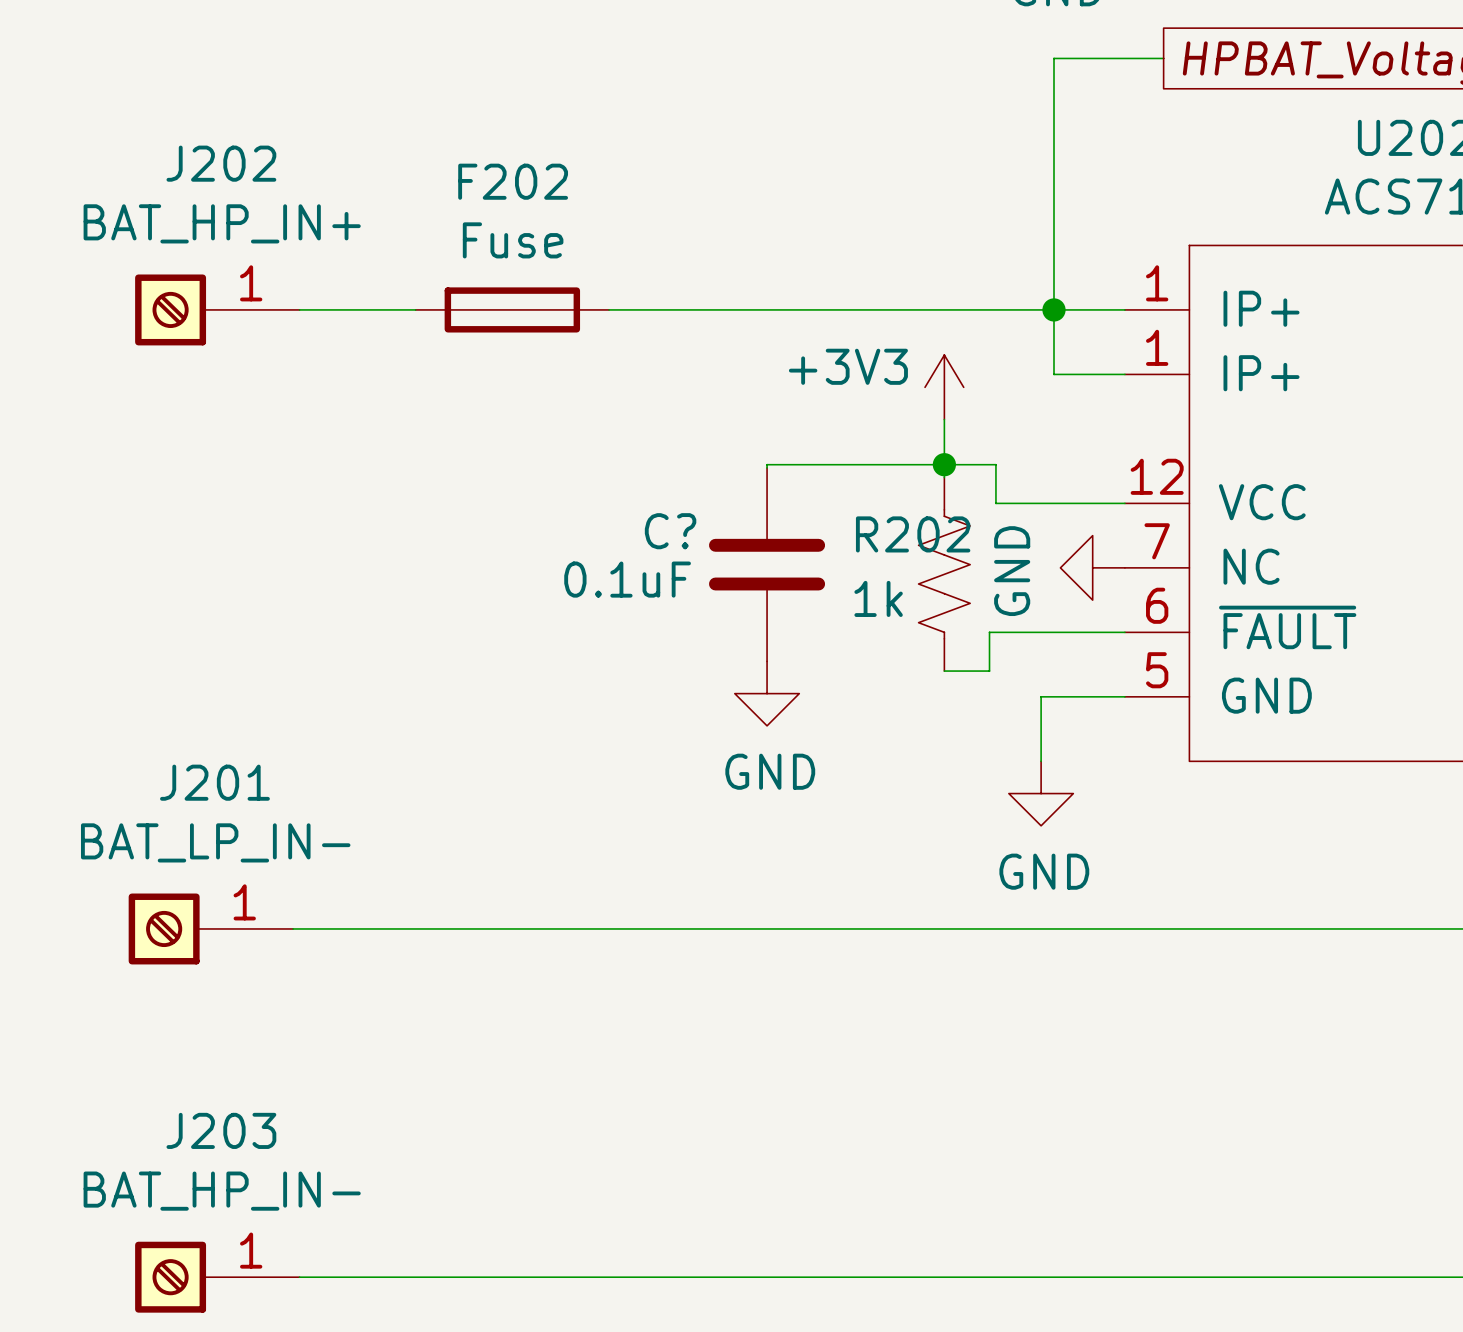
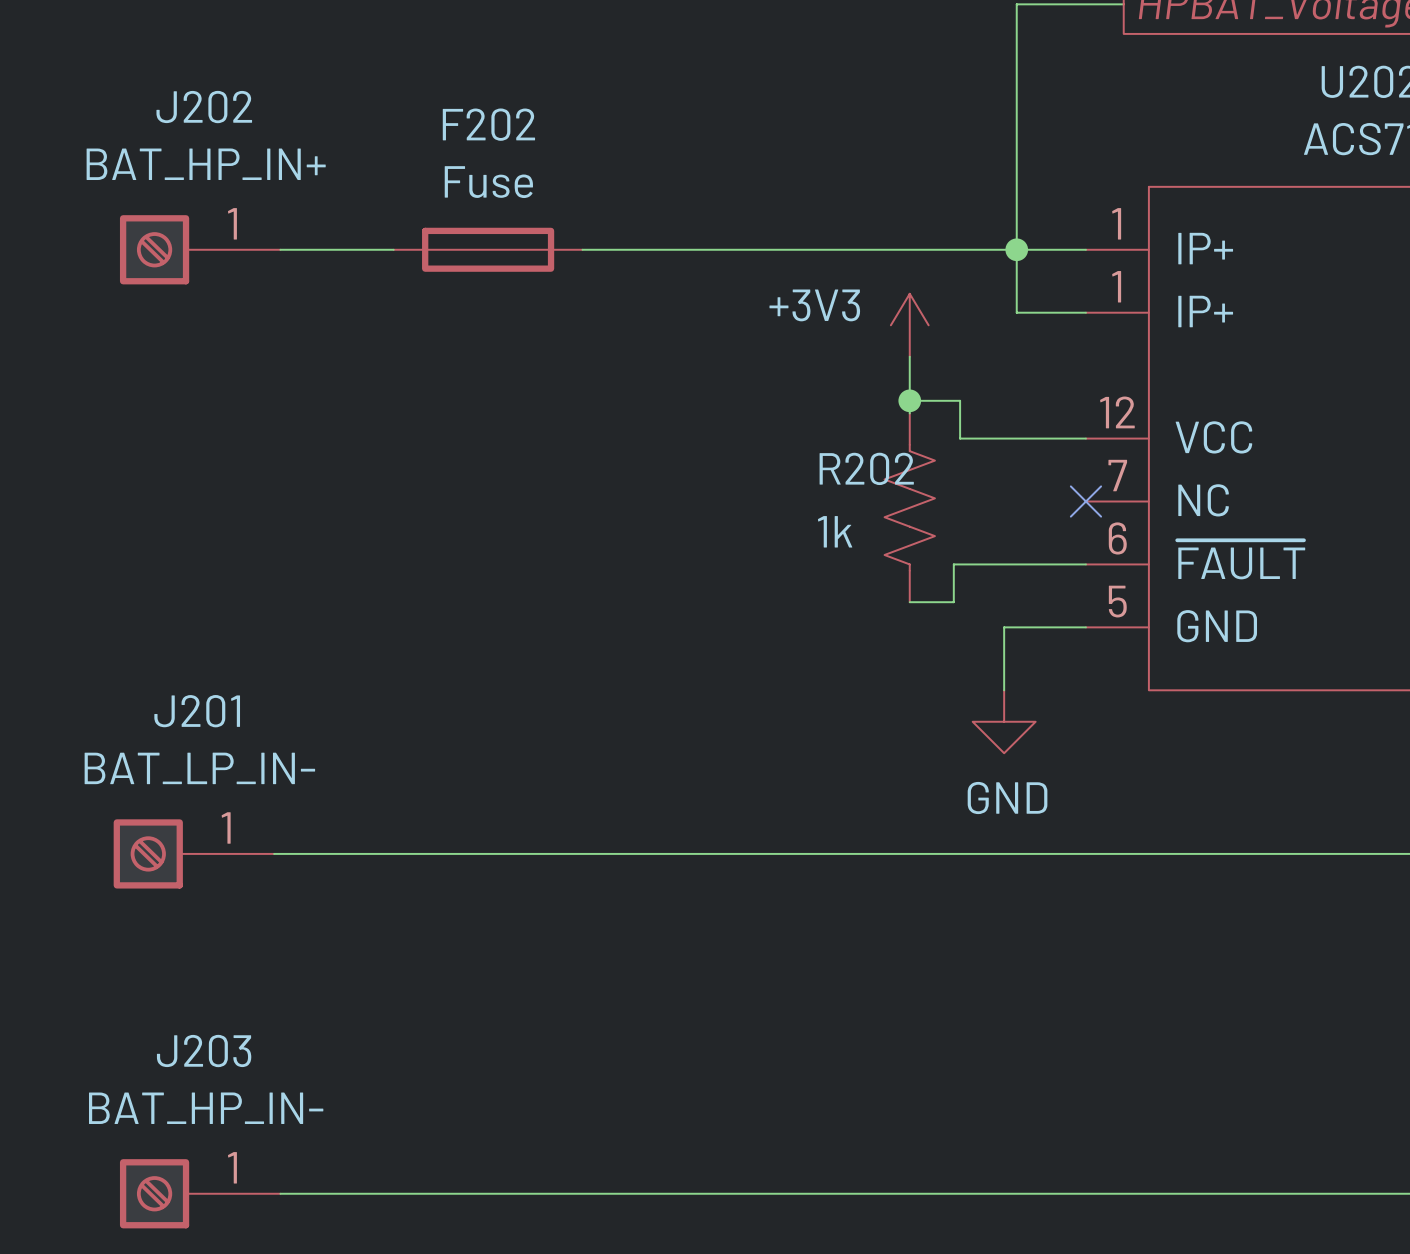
wire: (944, 464) (767, 464) (767, 467) -> none
C?: 0.1uF (767, 564) -> none
power symbol: GND (1092, 567) -> none
no-connect mark: none -> (1085, 501)
power symbol: GND (767, 693) -> none

